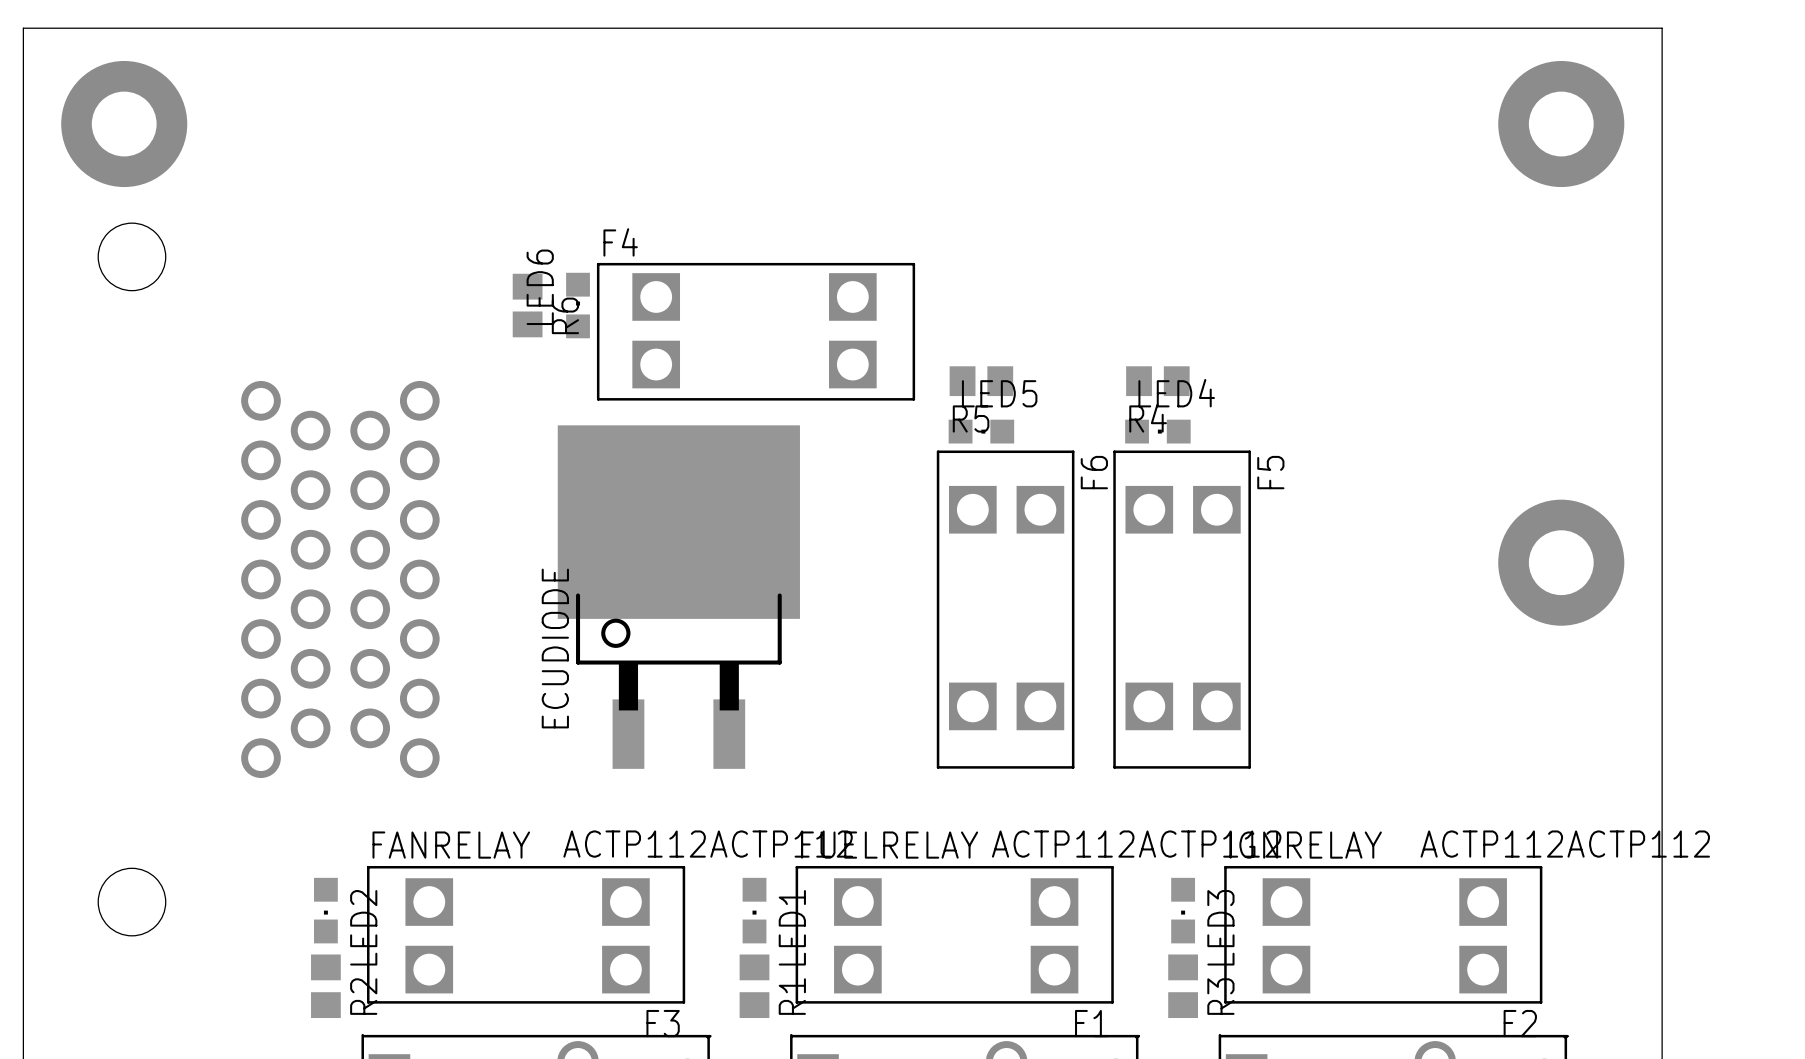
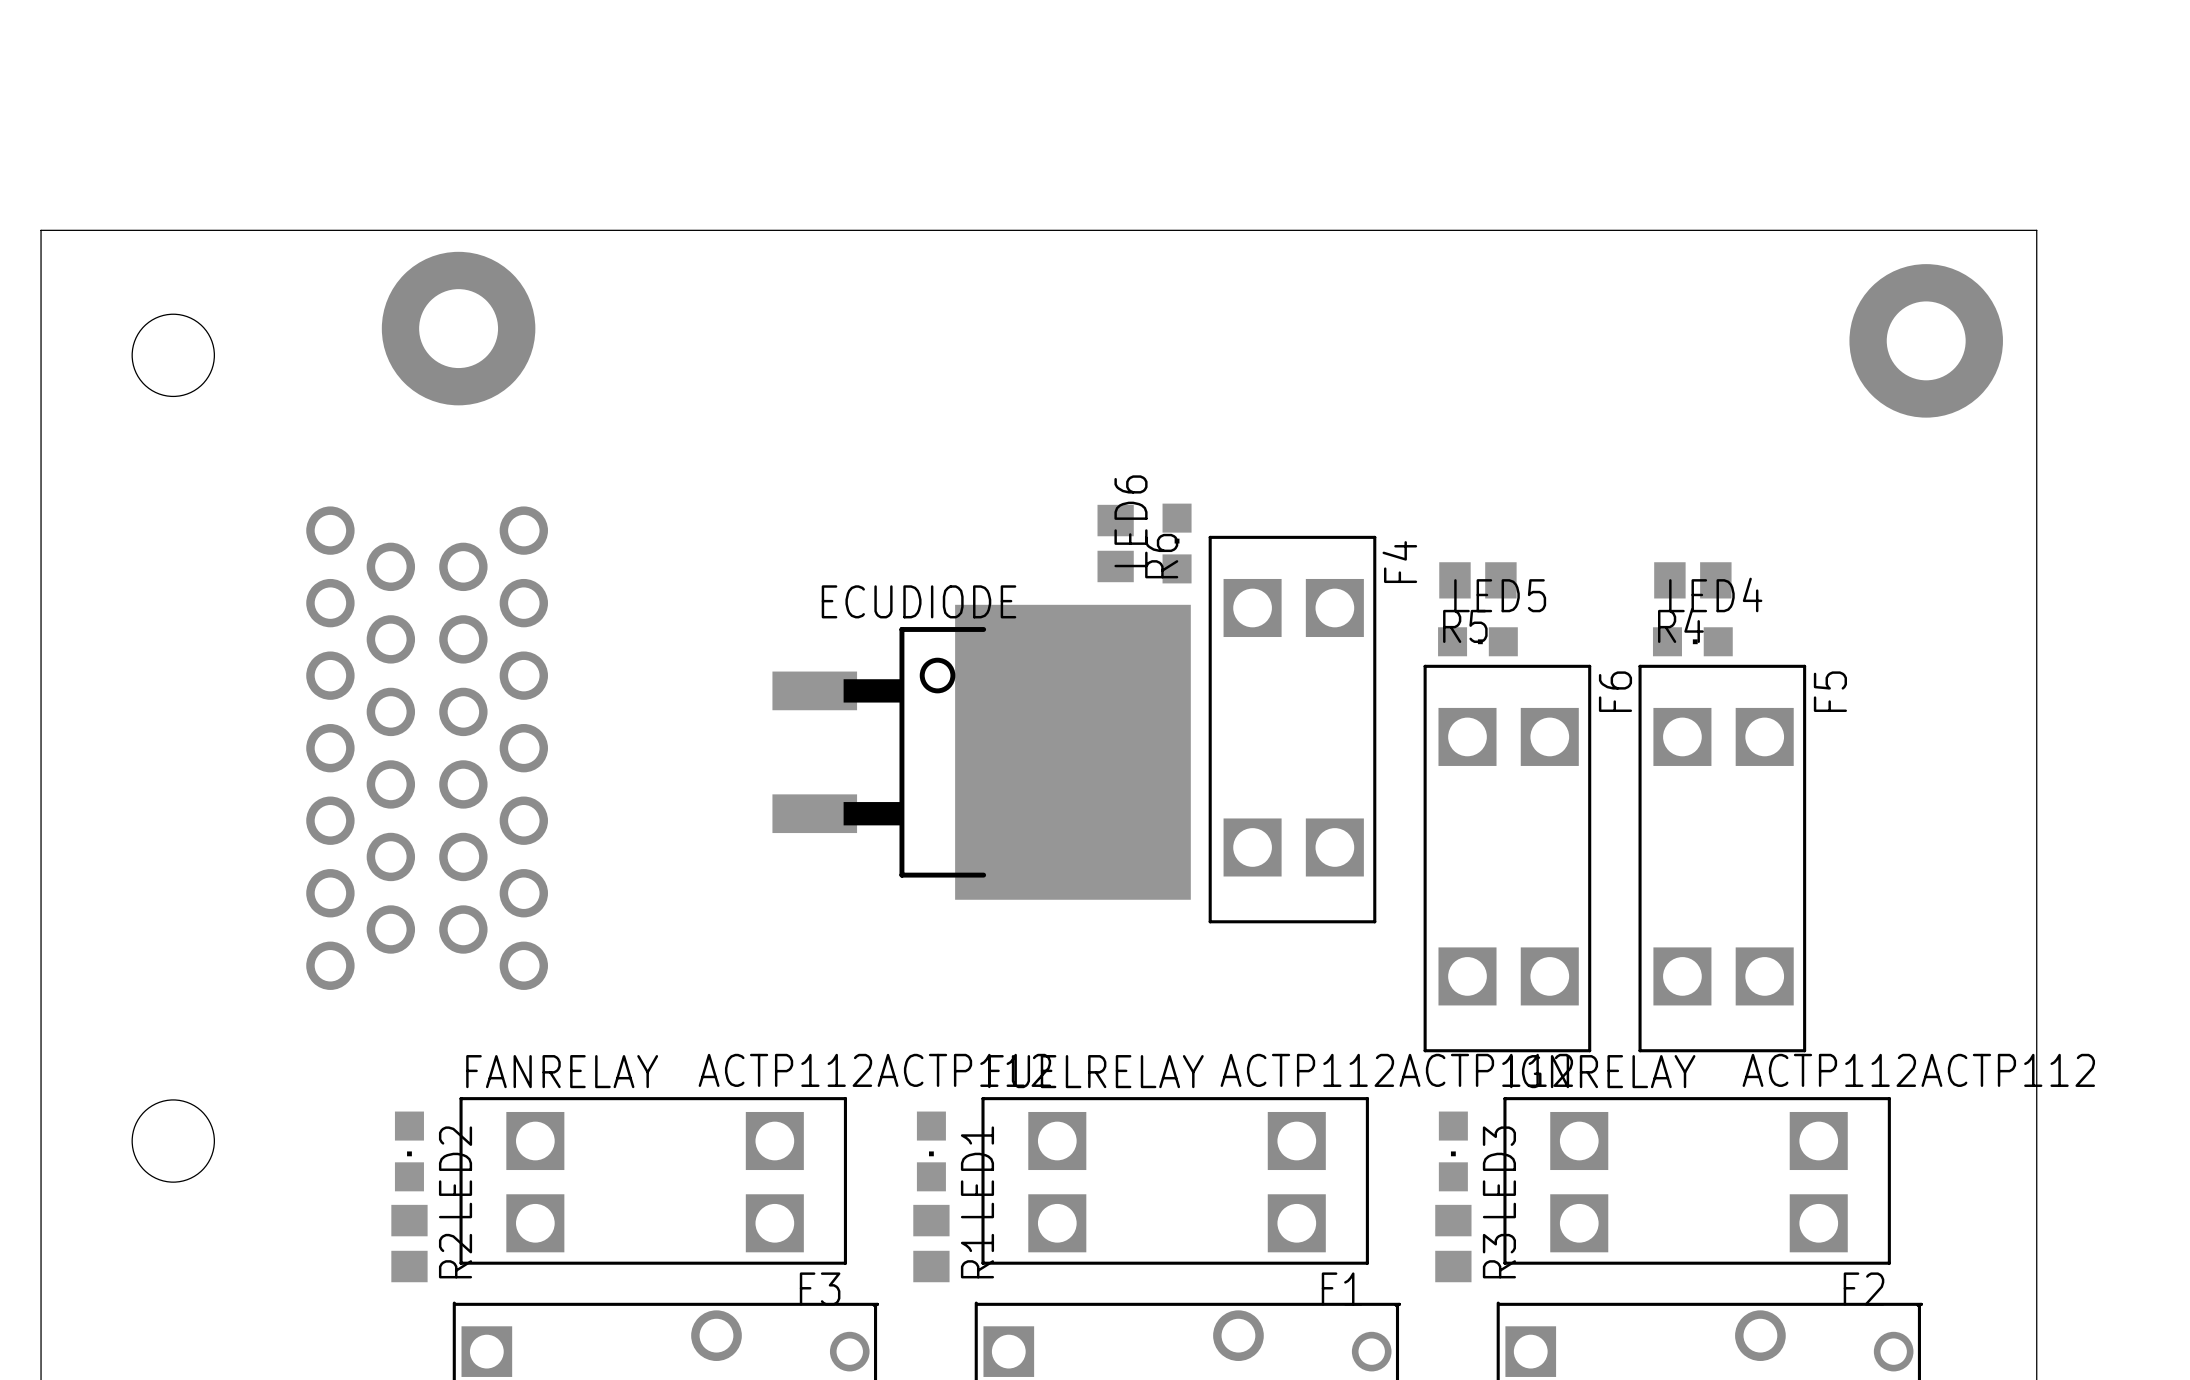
part position: (124, 124) -> (458, 328)
part position: (1561, 124) -> (1926, 340)
board edge: (23, 154) (23, 28) (1662, 28) (1662, 154) -> (41, 230) (2036, 230)
R6 position: (527, 305) -> (1115, 543)
LED6 position: (578, 305) -> (1177, 543)
F4 rotation: 0° (756, 331) -> 90° clockwise (1292, 729)
F4 position: (756, 331) -> (1292, 729)
R5 position: (981, 381) -> (1477, 580)
R4 position: (1157, 381) -> (1692, 580)
LED5 position: (981, 431) -> (1477, 641)
LED4 position: (1157, 431) -> (1692, 641)
part: (1561, 562) -> none
ECUDIODE rotation: 0° (678, 597) -> 90° clockwise (981, 752)
F6 position: (1005, 609) -> (1507, 858)
F5 position: (1182, 609) -> (1722, 858)

